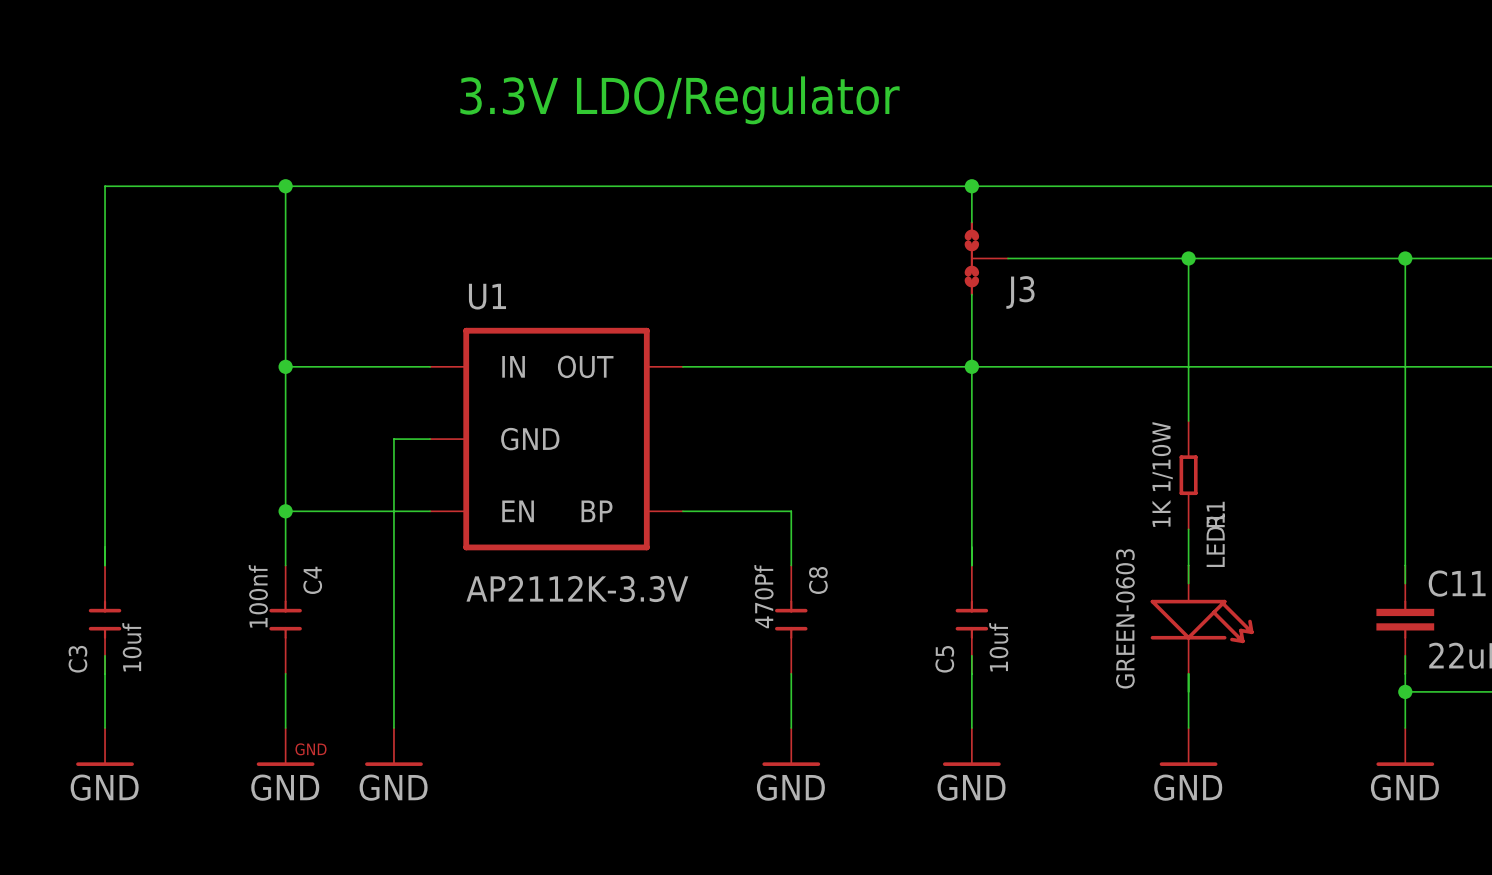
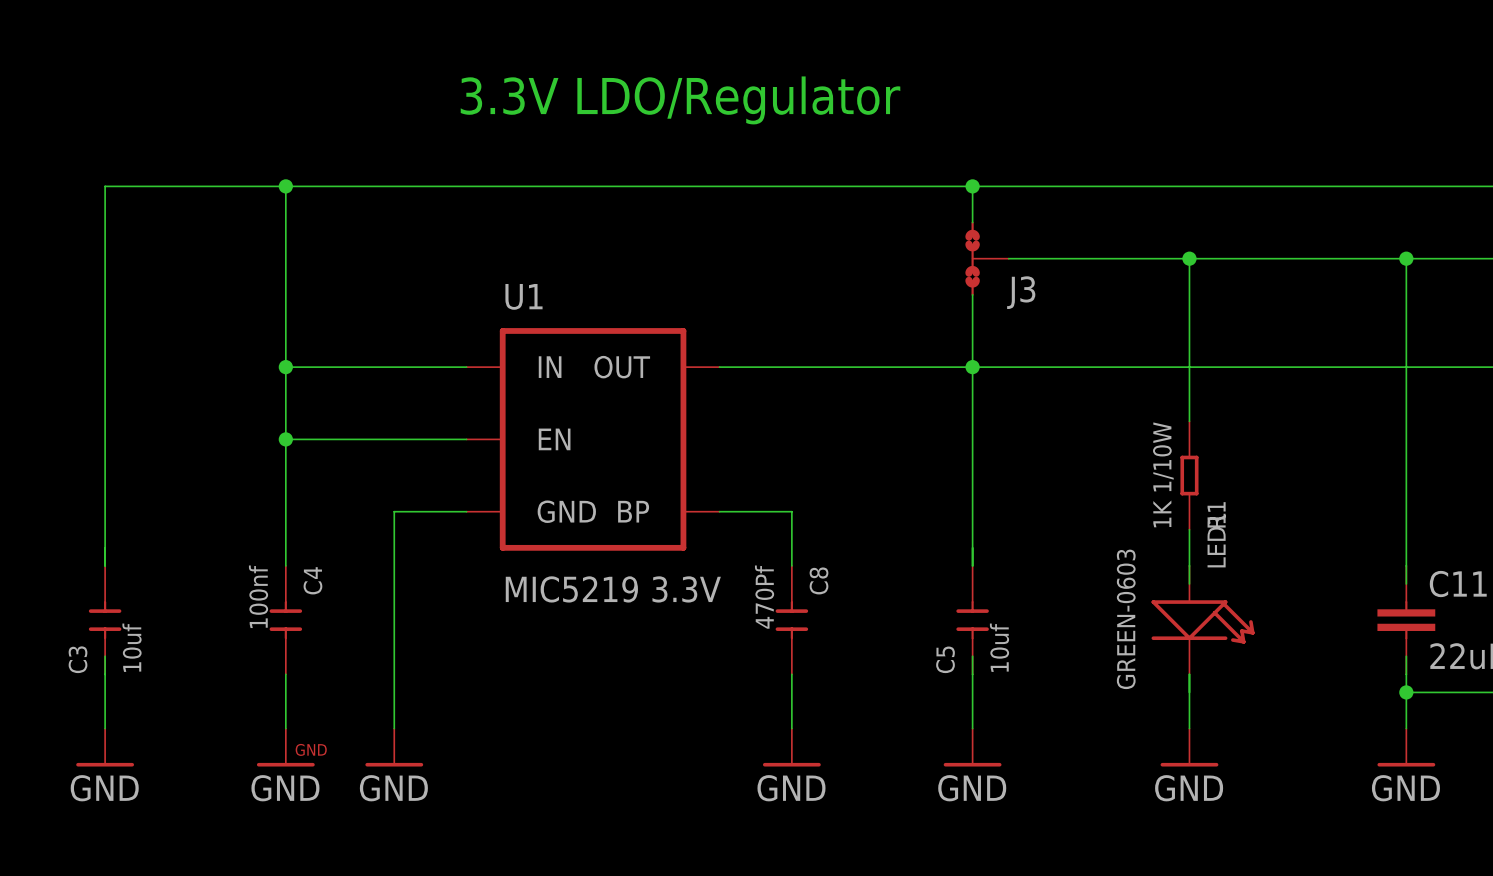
wire: (393, 439) (393, 511) (285, 511) -> (394, 439) (285, 439)
U1 pin name: GND (530, 439) -> EN (554, 439)
U1 position: (556, 439) -> (593, 439)
junction position: (285, 511) -> (285, 439)
U1 pin name: EN (518, 511) -> GND (566, 511)
U1 value: AP2112K-3.3V (577, 588) -> MIC5219 3.3V (613, 589)

